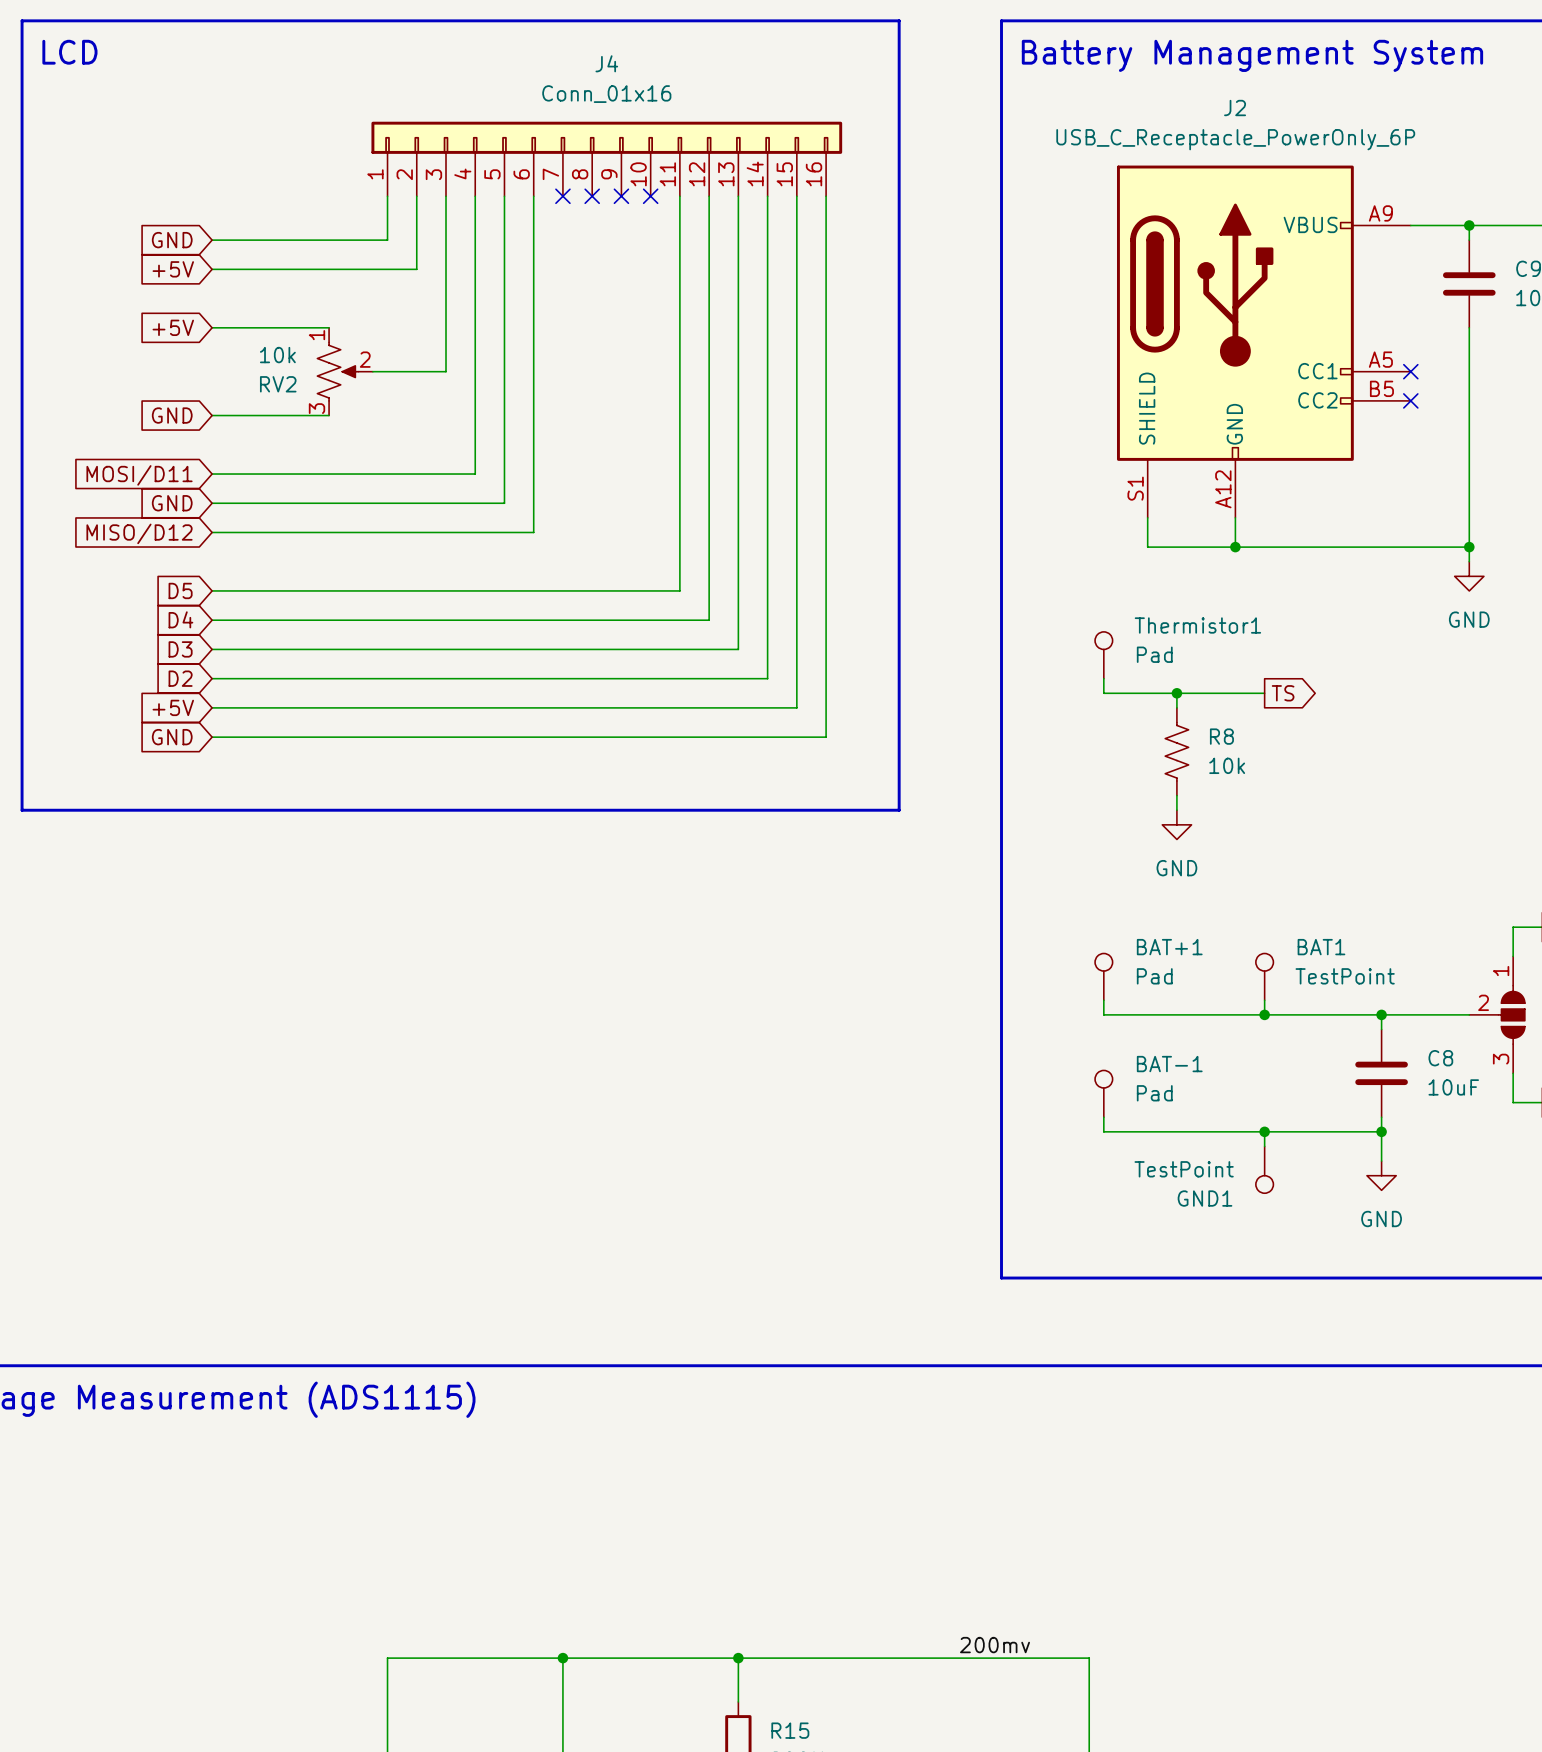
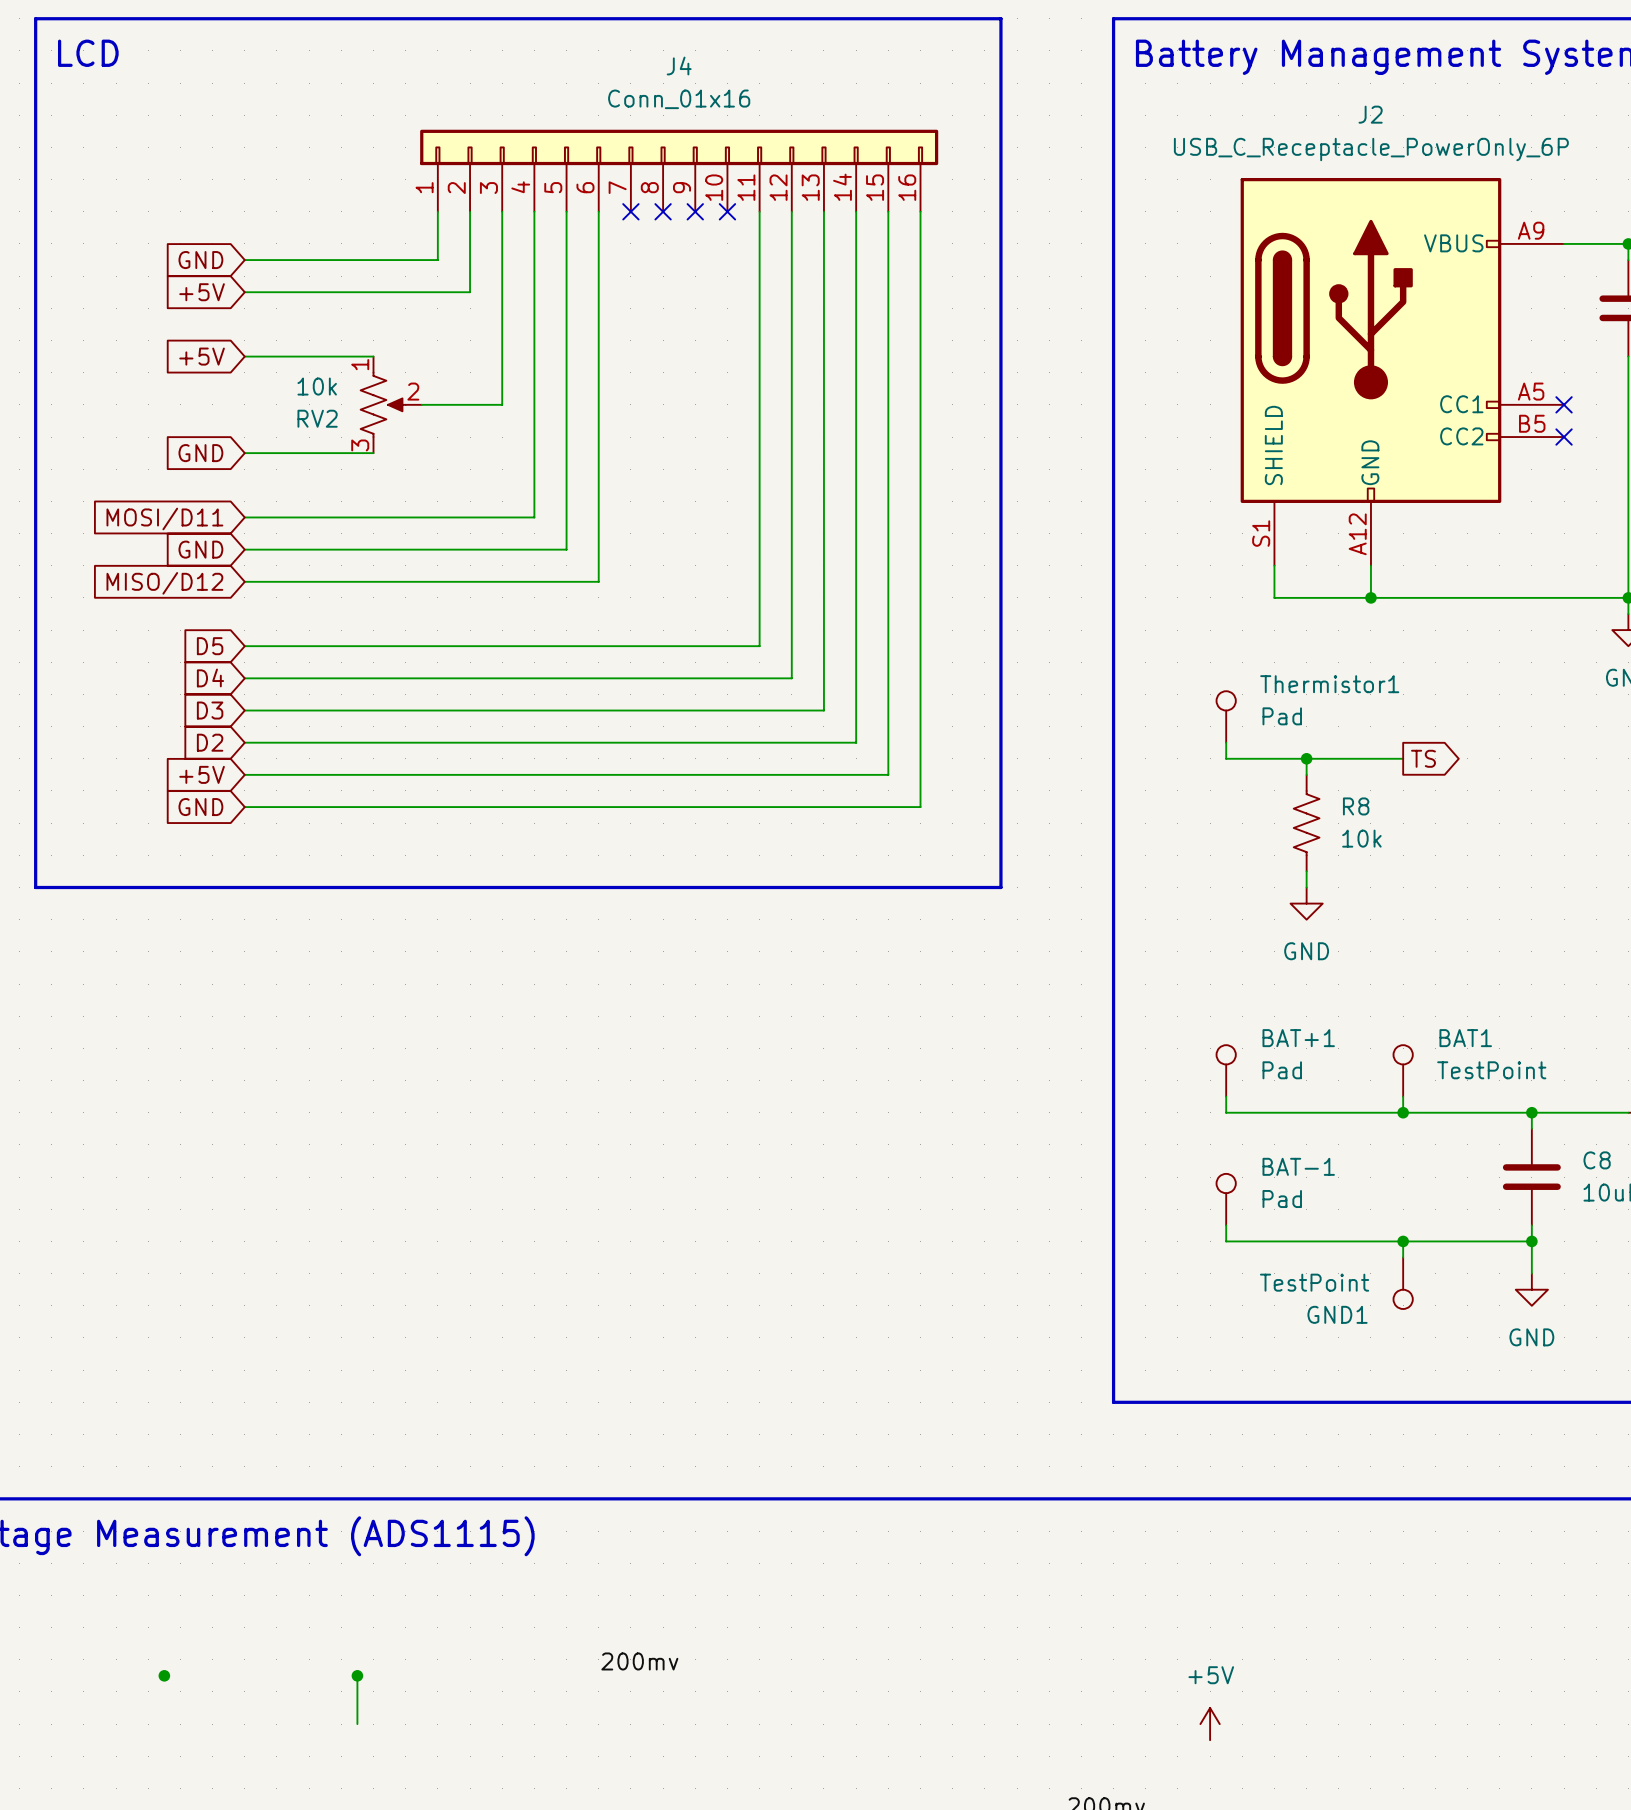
label: none -> 200mv (639, 1661)
junction: none -> (164, 1675)
wire: none -> (357, 1675) (357, 1724)
junction: none -> (357, 1675)
power symbol: none -> +5V (1210, 1724)

